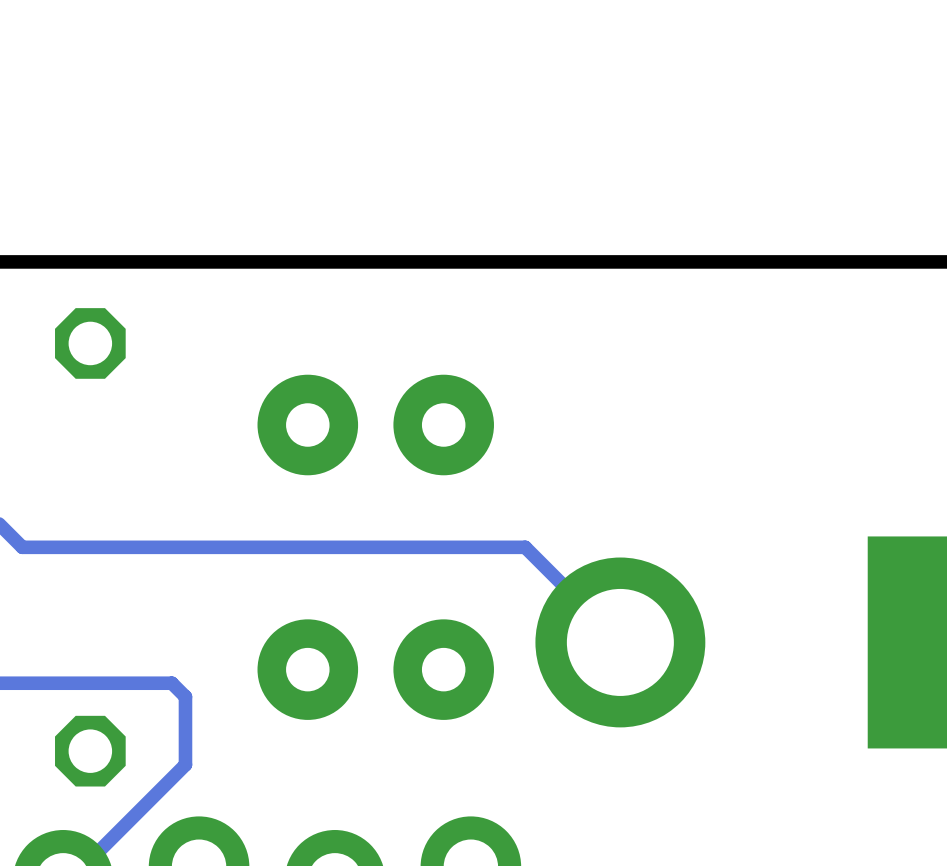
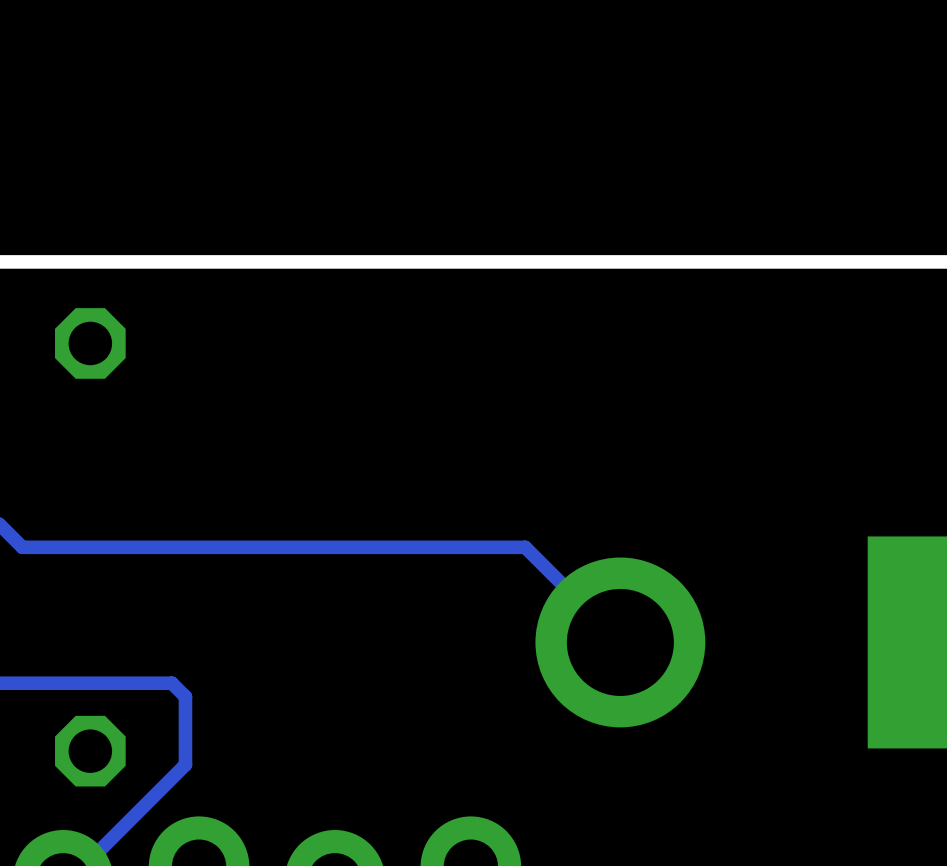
part: (375, 425) -> none
part: (375, 669) -> none

